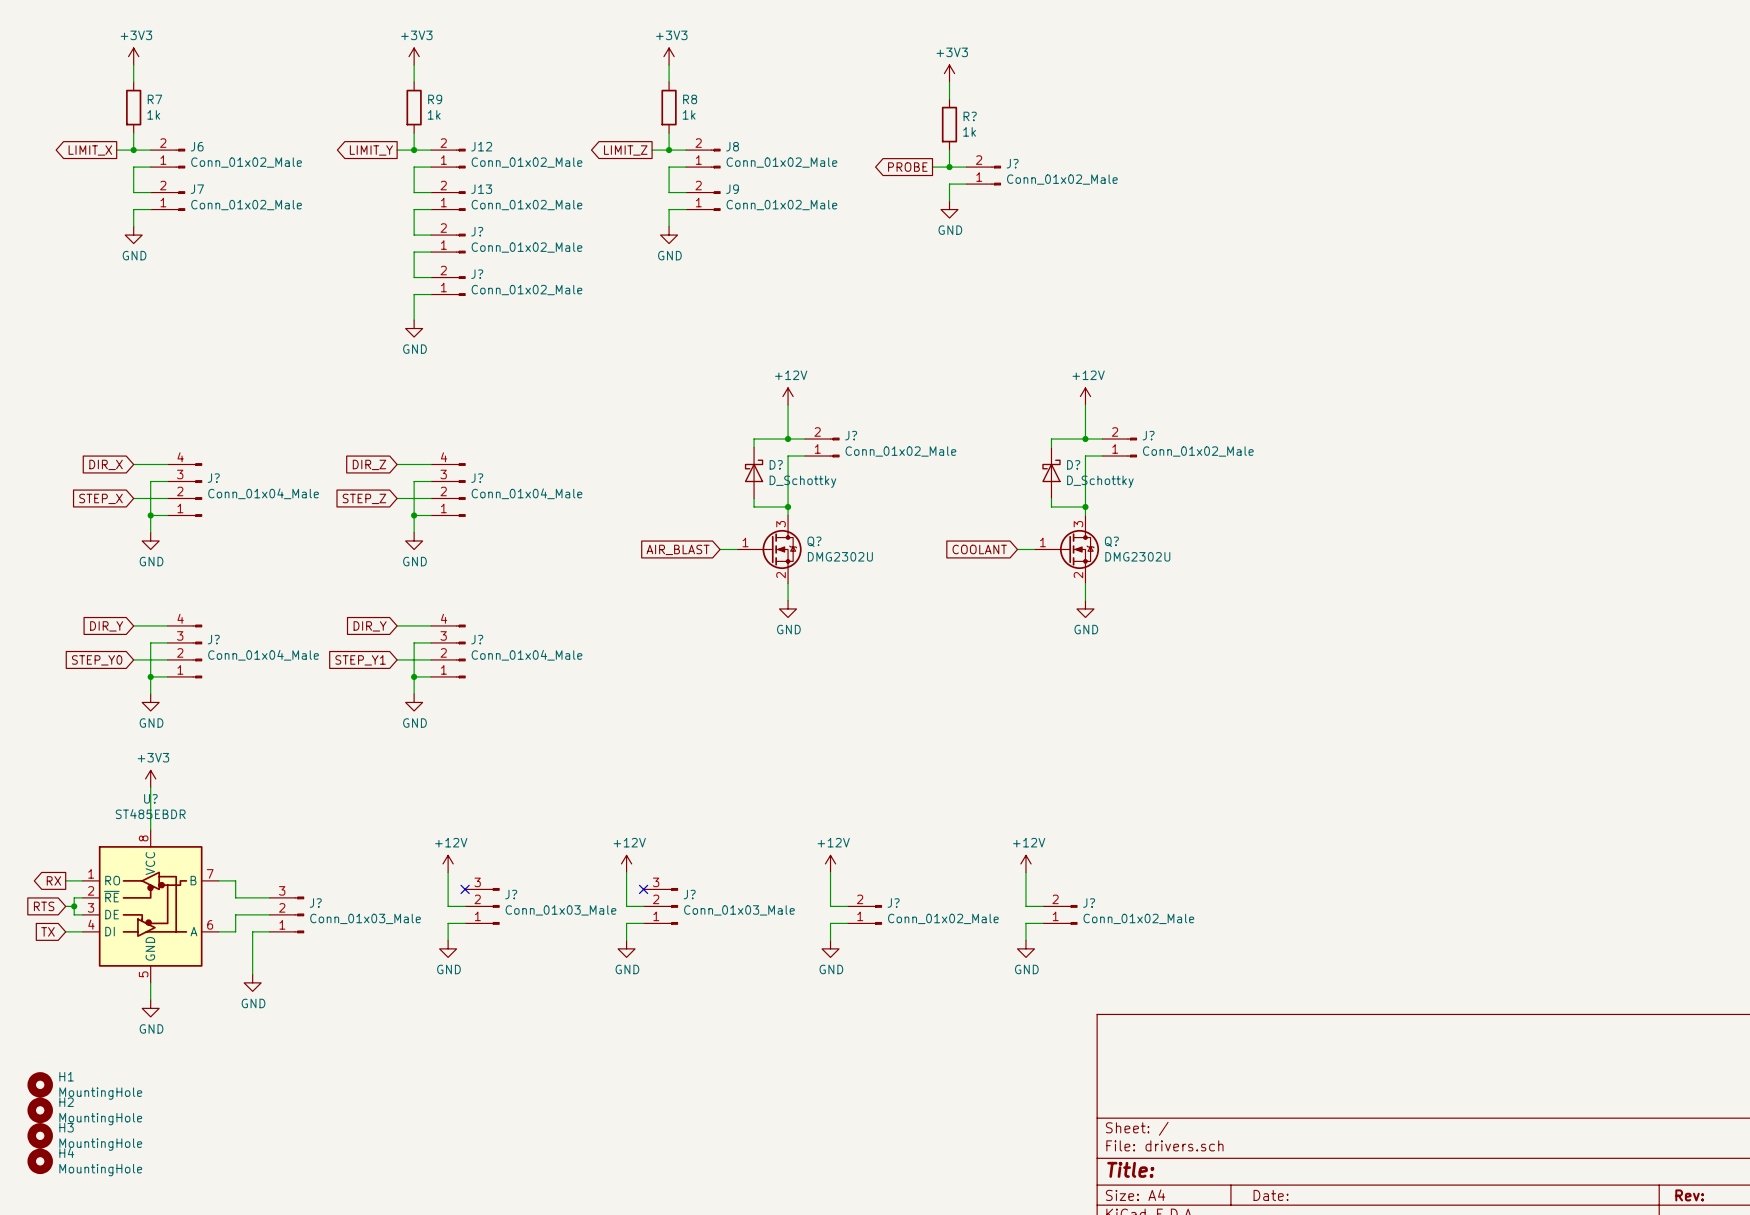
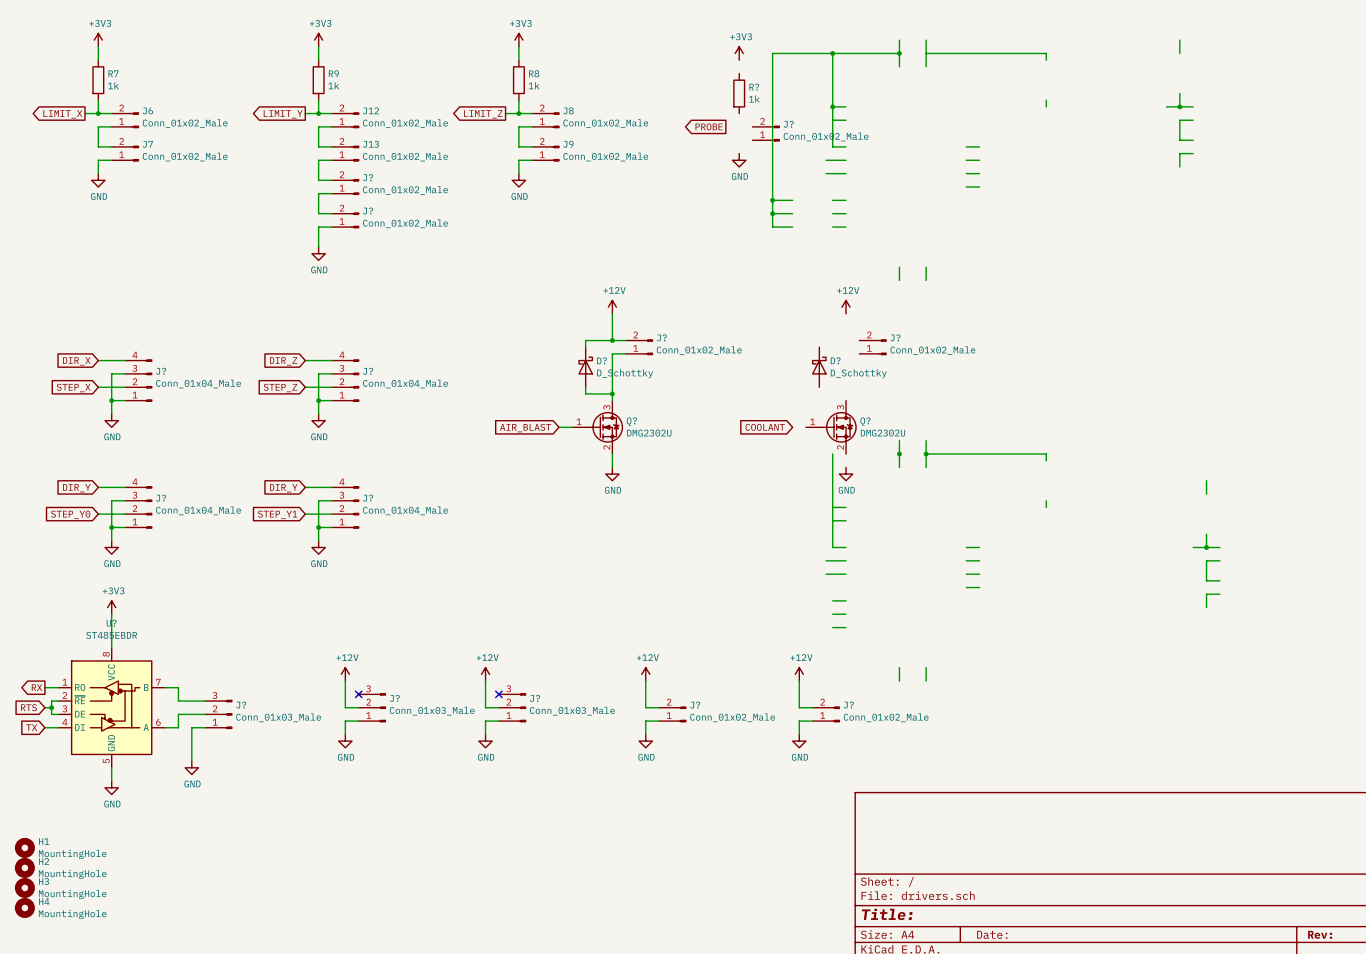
wire: none -> (899, 40) (899, 66)
wire: none -> (926, 40) (926, 66)
wire: none -> (1179, 40) (1179, 53)
wire: none -> (832, 53) (832, 146) (846, 146)
junction: none -> (832, 53)
wire: none -> (899, 53) (772, 53) (772, 227) (792, 227)
junction: none -> (899, 53)
wire: none -> (926, 53) (1046, 53) (1046, 60)
wire: (949, 82) (949, 99) -> none
wire: none -> (1179, 93) (1179, 106)
wire: none -> (1046, 100) (1046, 106)
wire: none -> (832, 106) (846, 106)
junction: none -> (832, 106)
wire: none -> (1166, 106) (1193, 106)
junction: none -> (1179, 106)
wire: (949, 150) (949, 167) -> none
wire: none -> (832, 120) (846, 120)
wire: none -> (1193, 120) (1179, 120) (1179, 140) (1193, 140)
wire: (932, 167) (966, 167) -> none
junction: (949, 167) -> none
wire: (966, 184) (949, 184) (949, 201) -> none
wire: none -> (966, 146) (979, 146)
wire: none -> (1193, 153) (1179, 153) (1179, 166)
wire: none -> (826, 160) (846, 160)
wire: none -> (966, 160) (979, 160)
wire: none -> (826, 173) (846, 173)
wire: none -> (966, 173) (979, 173)
wire: none -> (966, 186) (979, 186)
wire: none -> (772, 200) (792, 200)
junction: none -> (772, 200)
wire: none -> (832, 200) (846, 200)
wire: none -> (772, 213) (792, 213)
junction: none -> (772, 213)
wire: none -> (832, 213) (846, 213)
wire: none -> (832, 227) (846, 227)
wire: none -> (899, 267) (899, 280)
wire: none -> (926, 267) (926, 280)
wire: (1085, 405) (1085, 439) -> none
junction: (1085, 439) -> none
wire: (1102, 439) (1051, 439) (1051, 447) -> none
wire: (1102, 456) (1085, 456) (1085, 515) -> none
wire: (1051, 498) (1051, 506) (1085, 506) -> none
junction: (1085, 506) -> none
wire: (1017, 549) (1034, 549) -> (832, 507) (846, 507)
wire: none -> (899, 440) (899, 467)
wire: none -> (926, 440) (926, 467)
wire: none -> (832, 454) (832, 547) (846, 547)
wire: (1085, 583) (1085, 600) -> none
junction: none -> (899, 454)
wire: none -> (926, 454) (1046, 454) (1046, 460)
junction: none -> (926, 454)
wire: none -> (1206, 480) (1206, 494)
wire: none -> (1046, 500) (1046, 507)
wire: none -> (832, 520) (846, 520)
wire: none -> (1206, 534) (1206, 547)
wire: none -> (966, 547) (979, 547)
wire: none -> (1193, 547) (1219, 547)
junction: none -> (1206, 547)
wire: none -> (826, 560) (846, 560)
wire: none -> (966, 560) (979, 560)
wire: none -> (1219, 560) (1206, 560) (1206, 580) (1219, 580)
wire: none -> (826, 574) (846, 574)
wire: none -> (966, 574) (979, 574)
wire: none -> (966, 587) (979, 587)
wire: none -> (1219, 594) (1206, 594) (1206, 607)
wire: none -> (832, 600) (846, 600)
wire: none -> (832, 614) (846, 614)
wire: none -> (832, 627) (846, 627)
wire: none -> (899, 667) (899, 681)
wire: none -> (926, 667) (926, 681)

